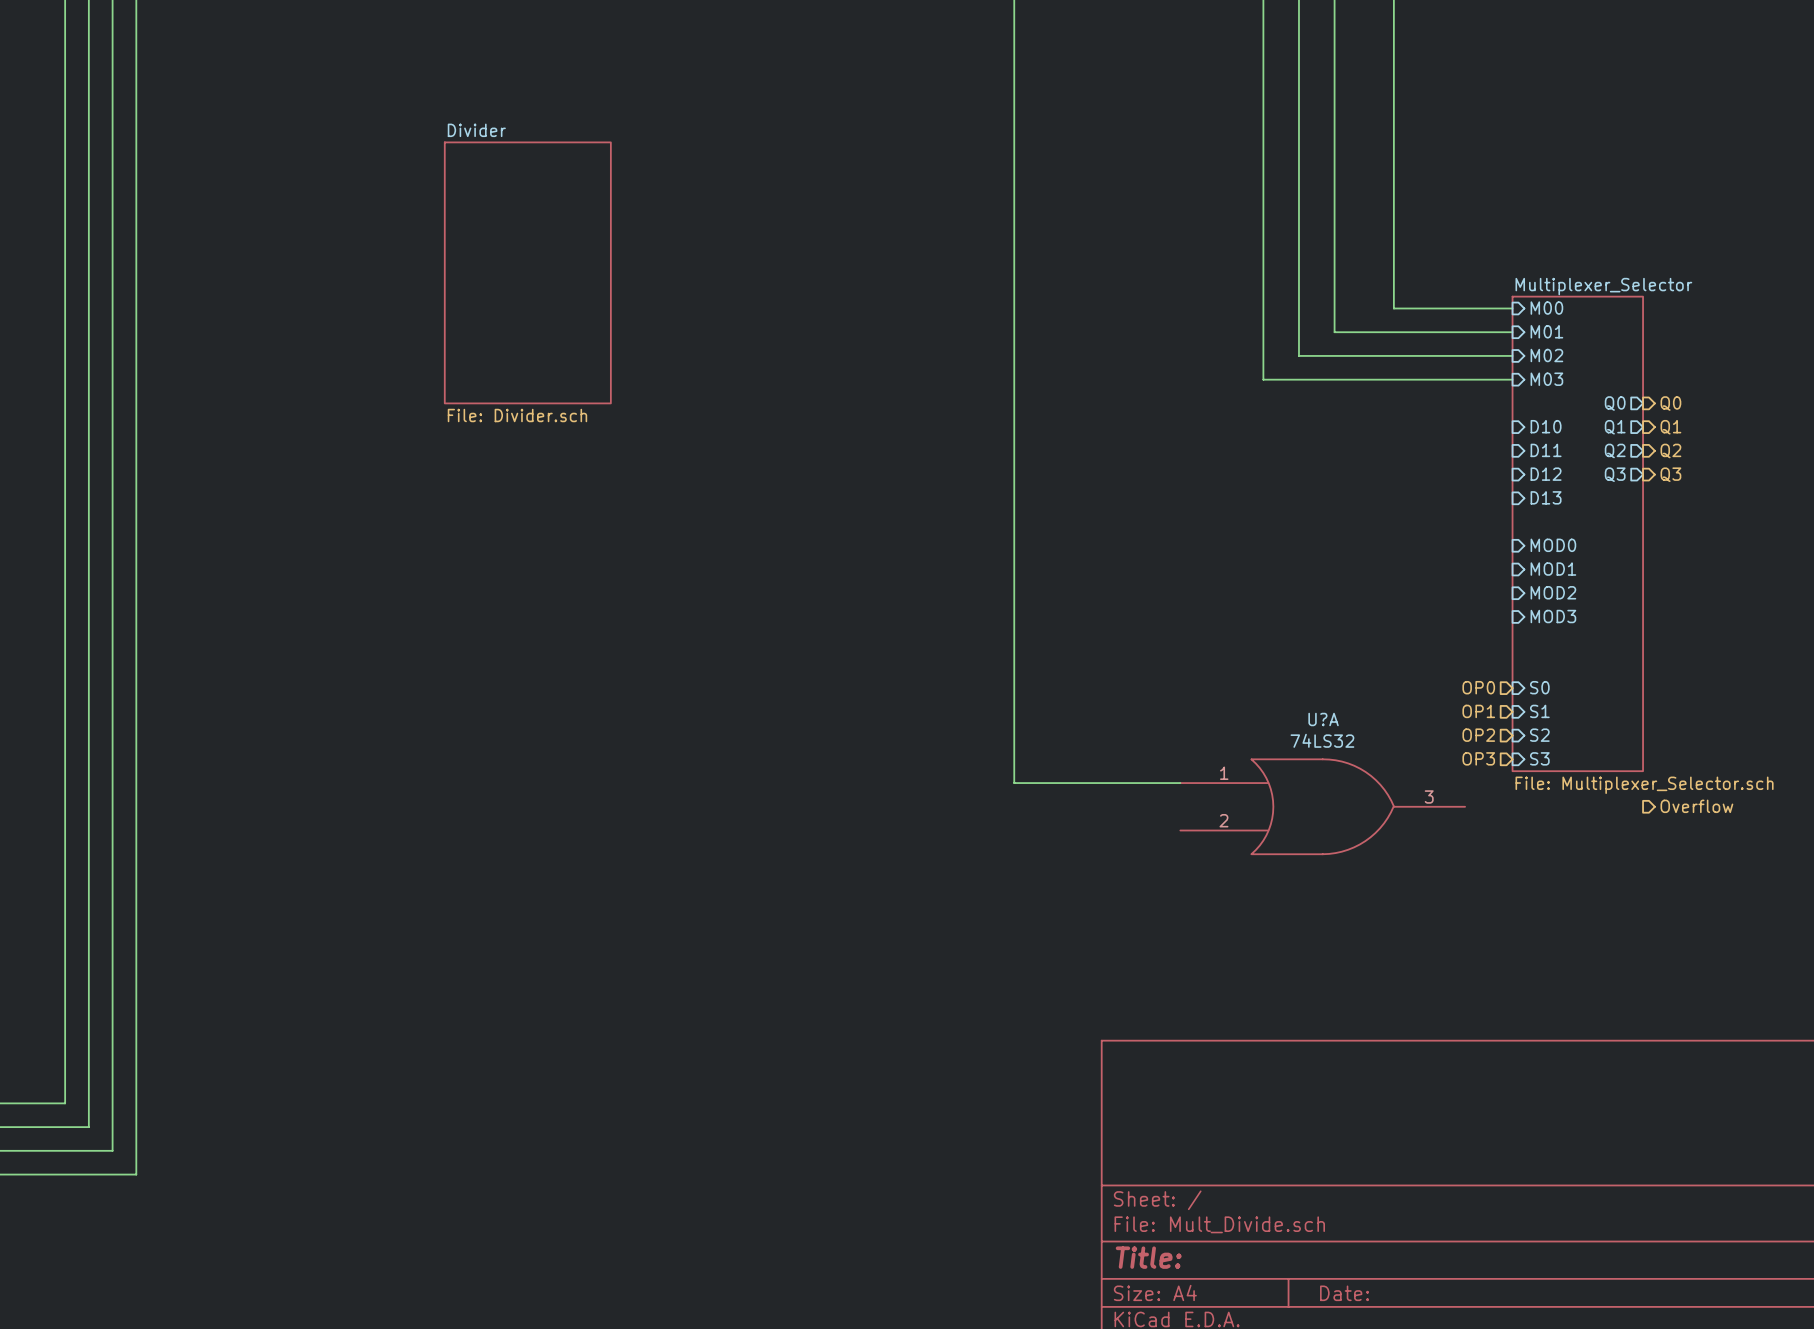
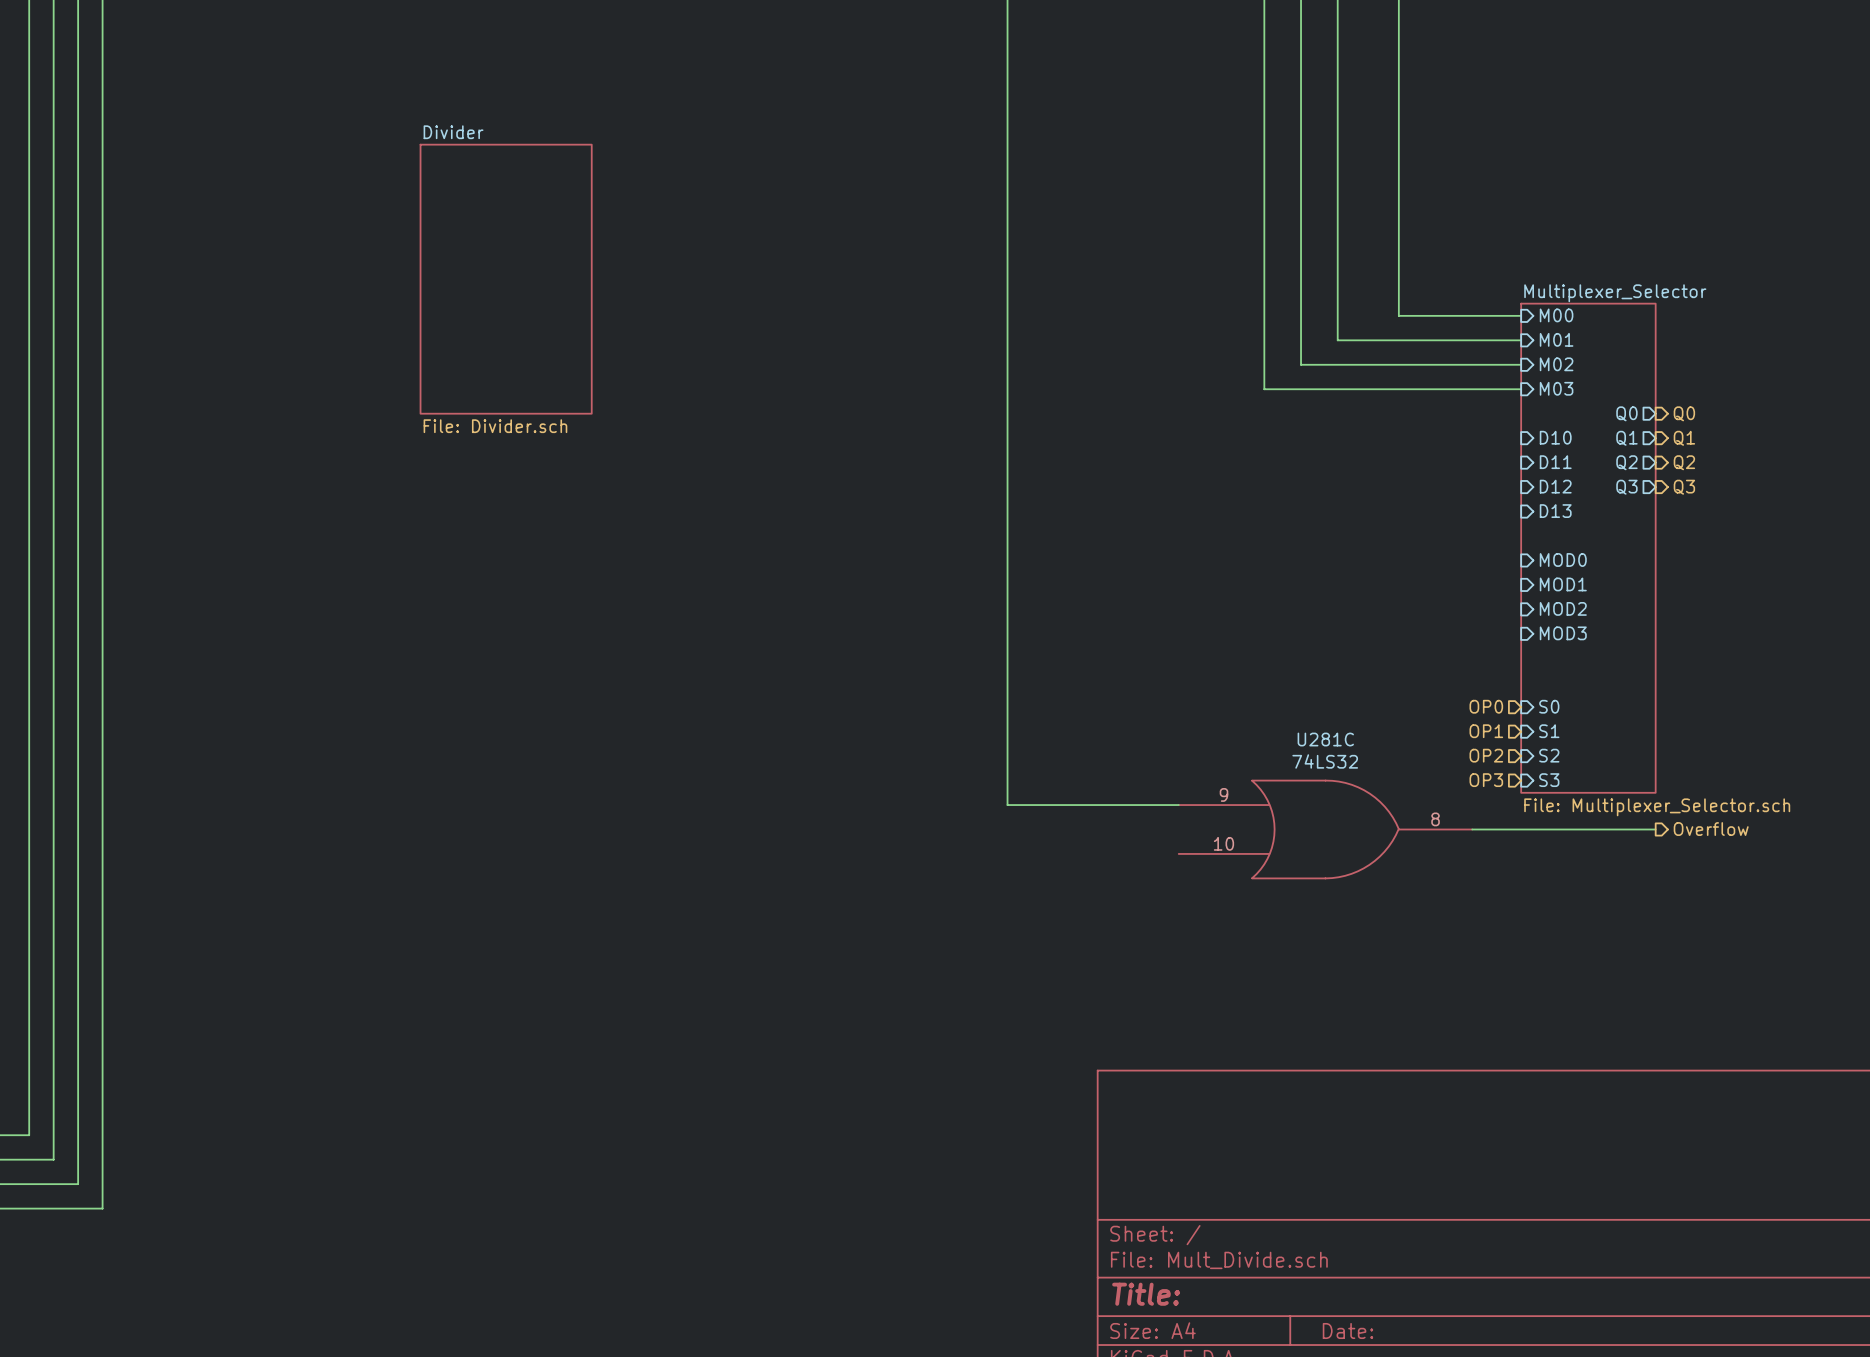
U?A name: U?A (1323, 719) -> U281C (1325, 739)
U?A pin number: 1 (1224, 773) -> 9 (1223, 794)
U?A pin number: 3 (1429, 796) -> 8 (1435, 819)
wire: none -> (1472, 829) (1655, 829)
U?A pin number: 2 (1223, 820) -> 10 (1223, 843)

